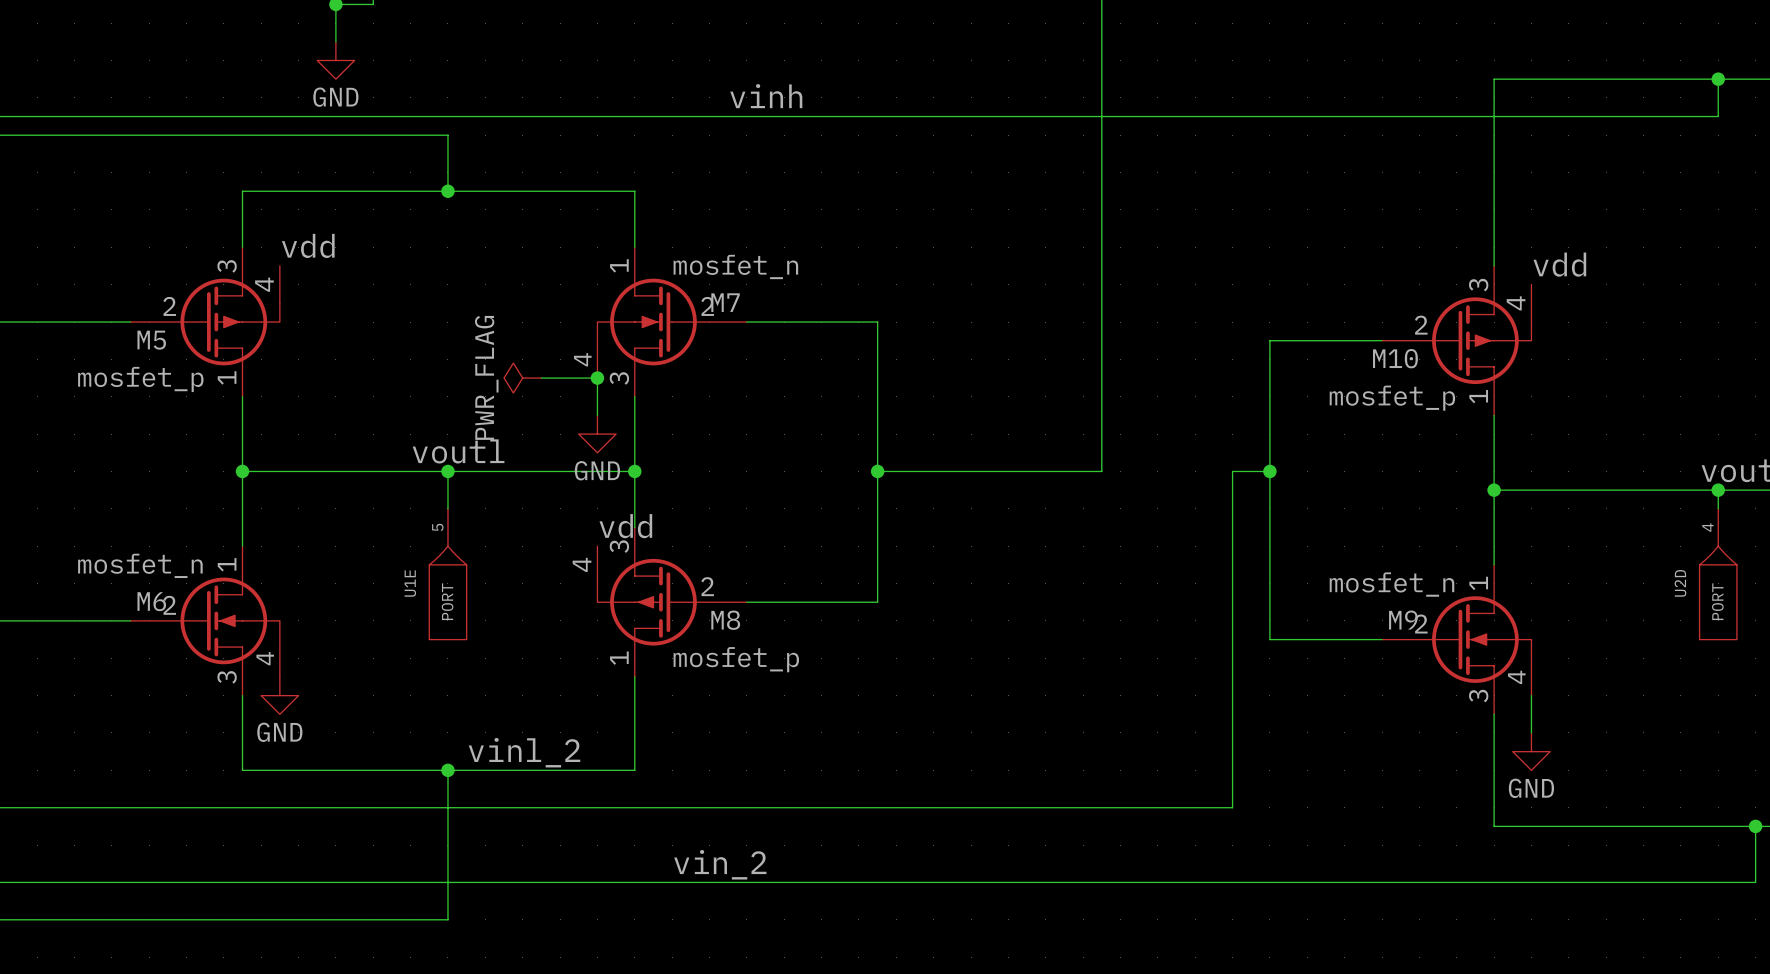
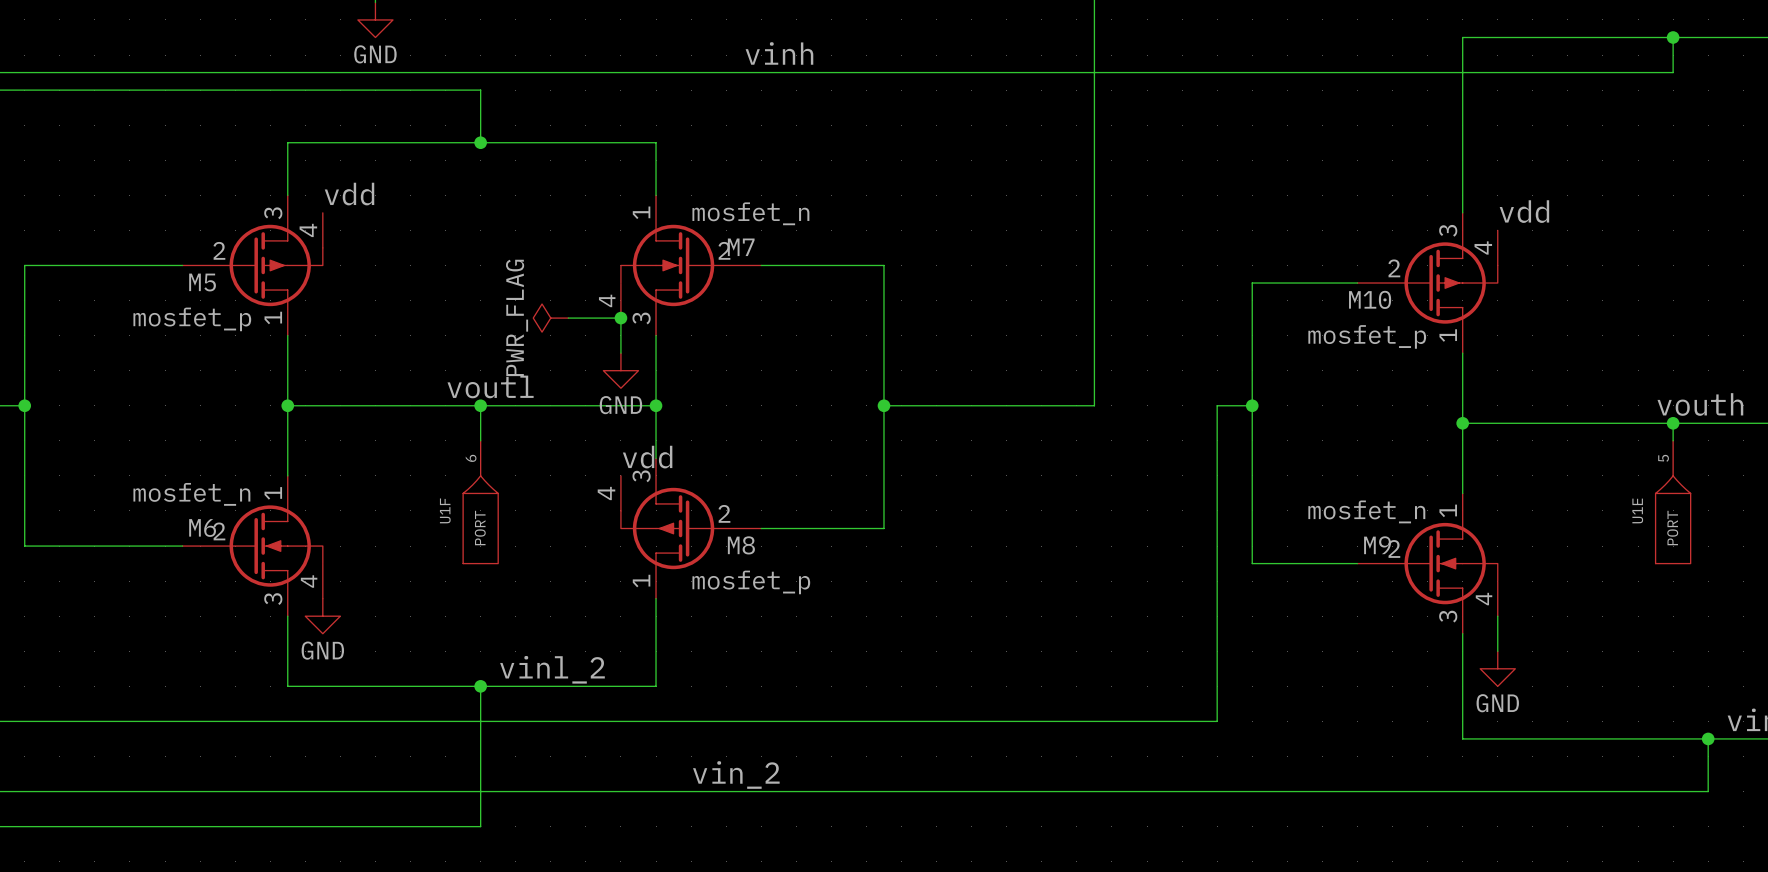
U1E position: (447, 574) -> (1673, 502)
U1F: none -> PORT (480, 502)
U2D: PORT (1718, 574) -> none

